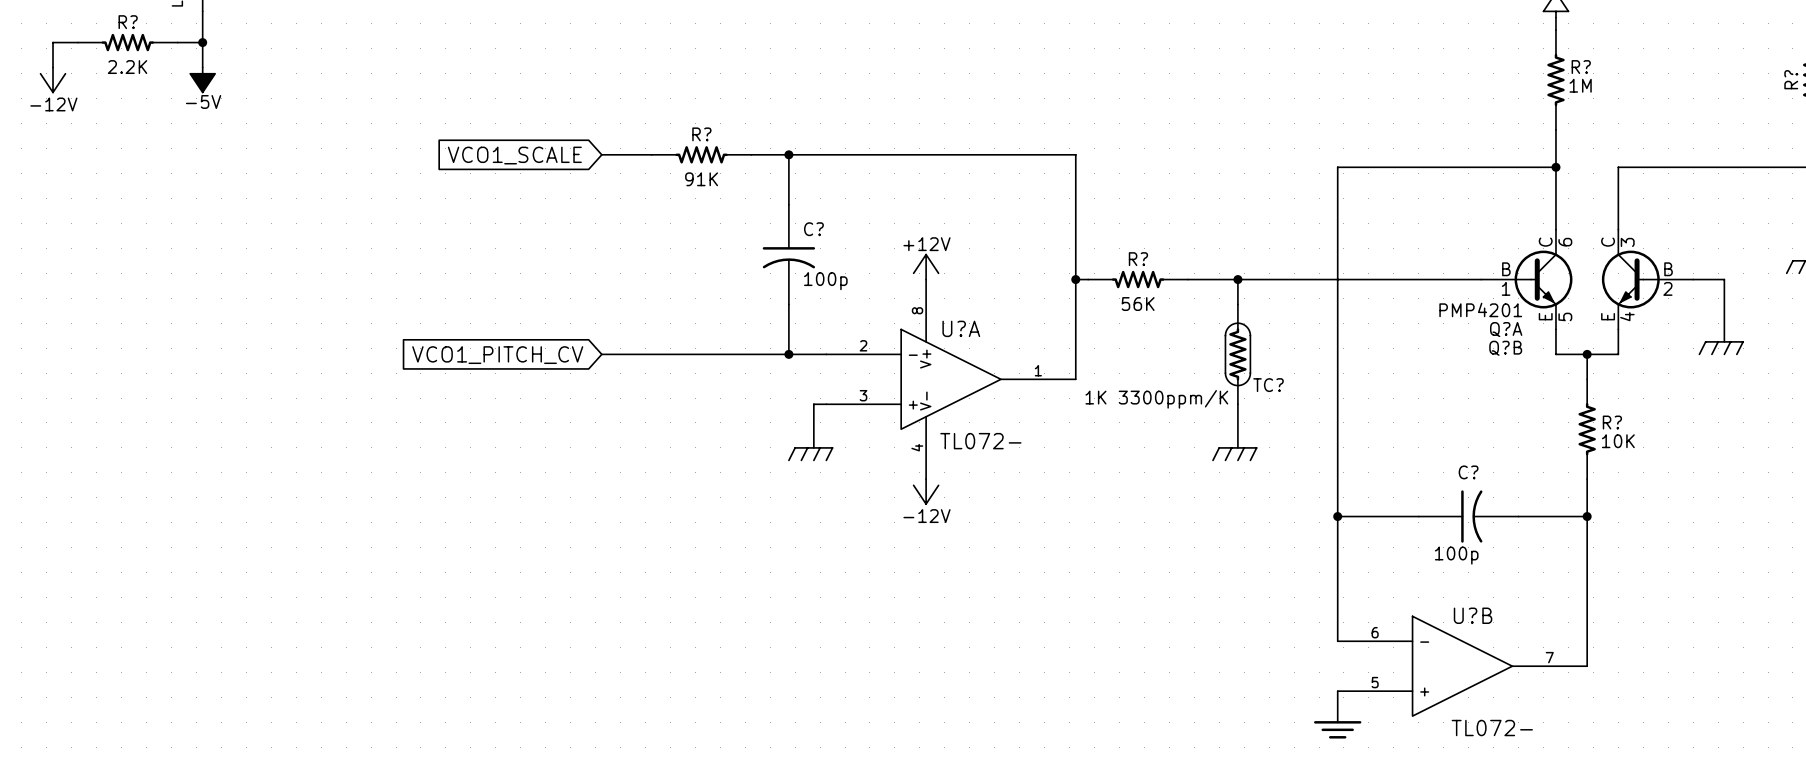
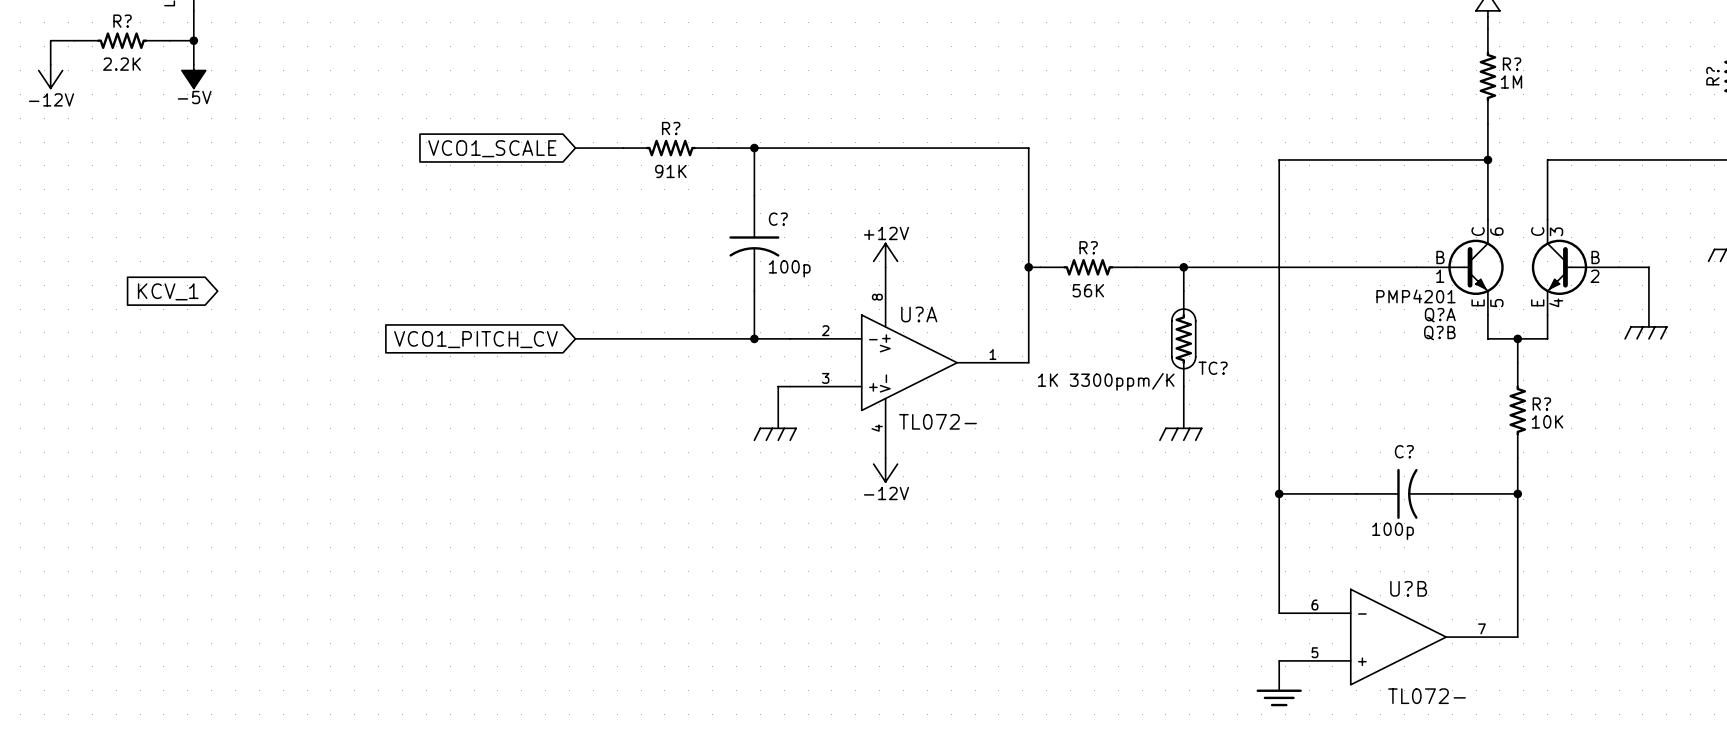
global label: none -> KCV_1 (168, 291)

